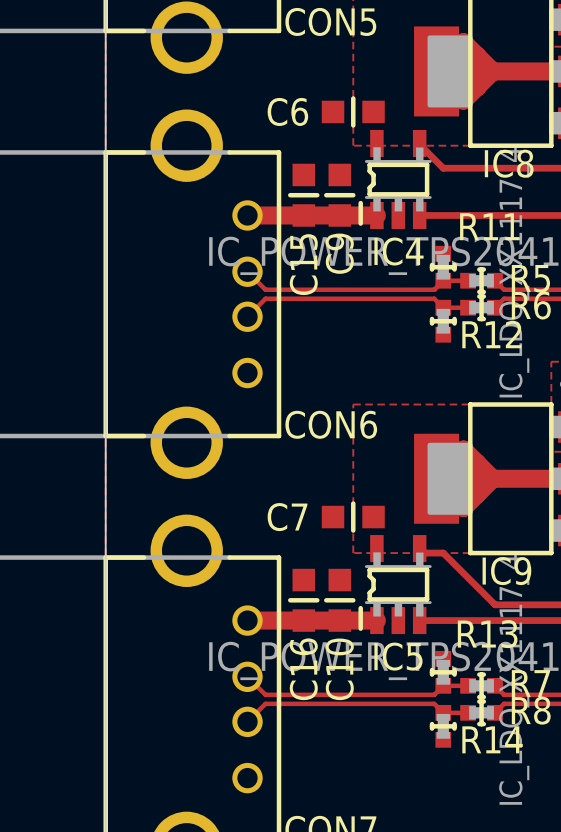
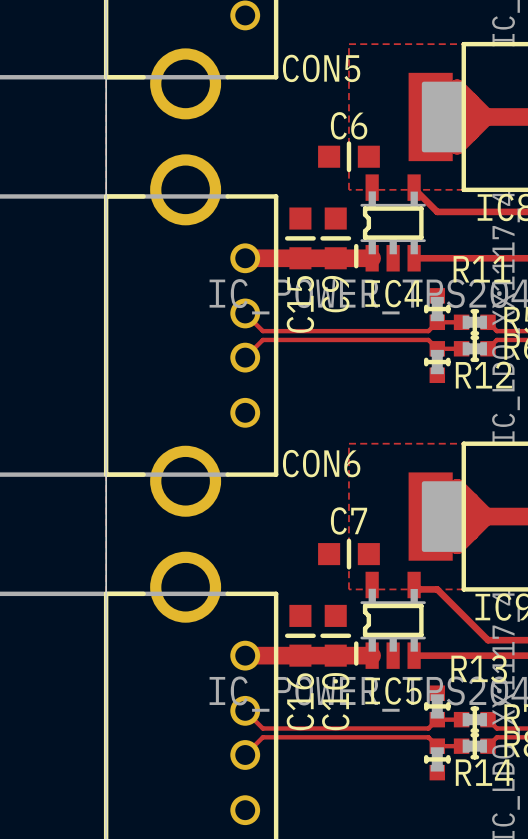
C6 name position: C6 (287, 111) -> C6 (349, 125)
C7 name position: C7 (287, 517) -> C7 (349, 520)

